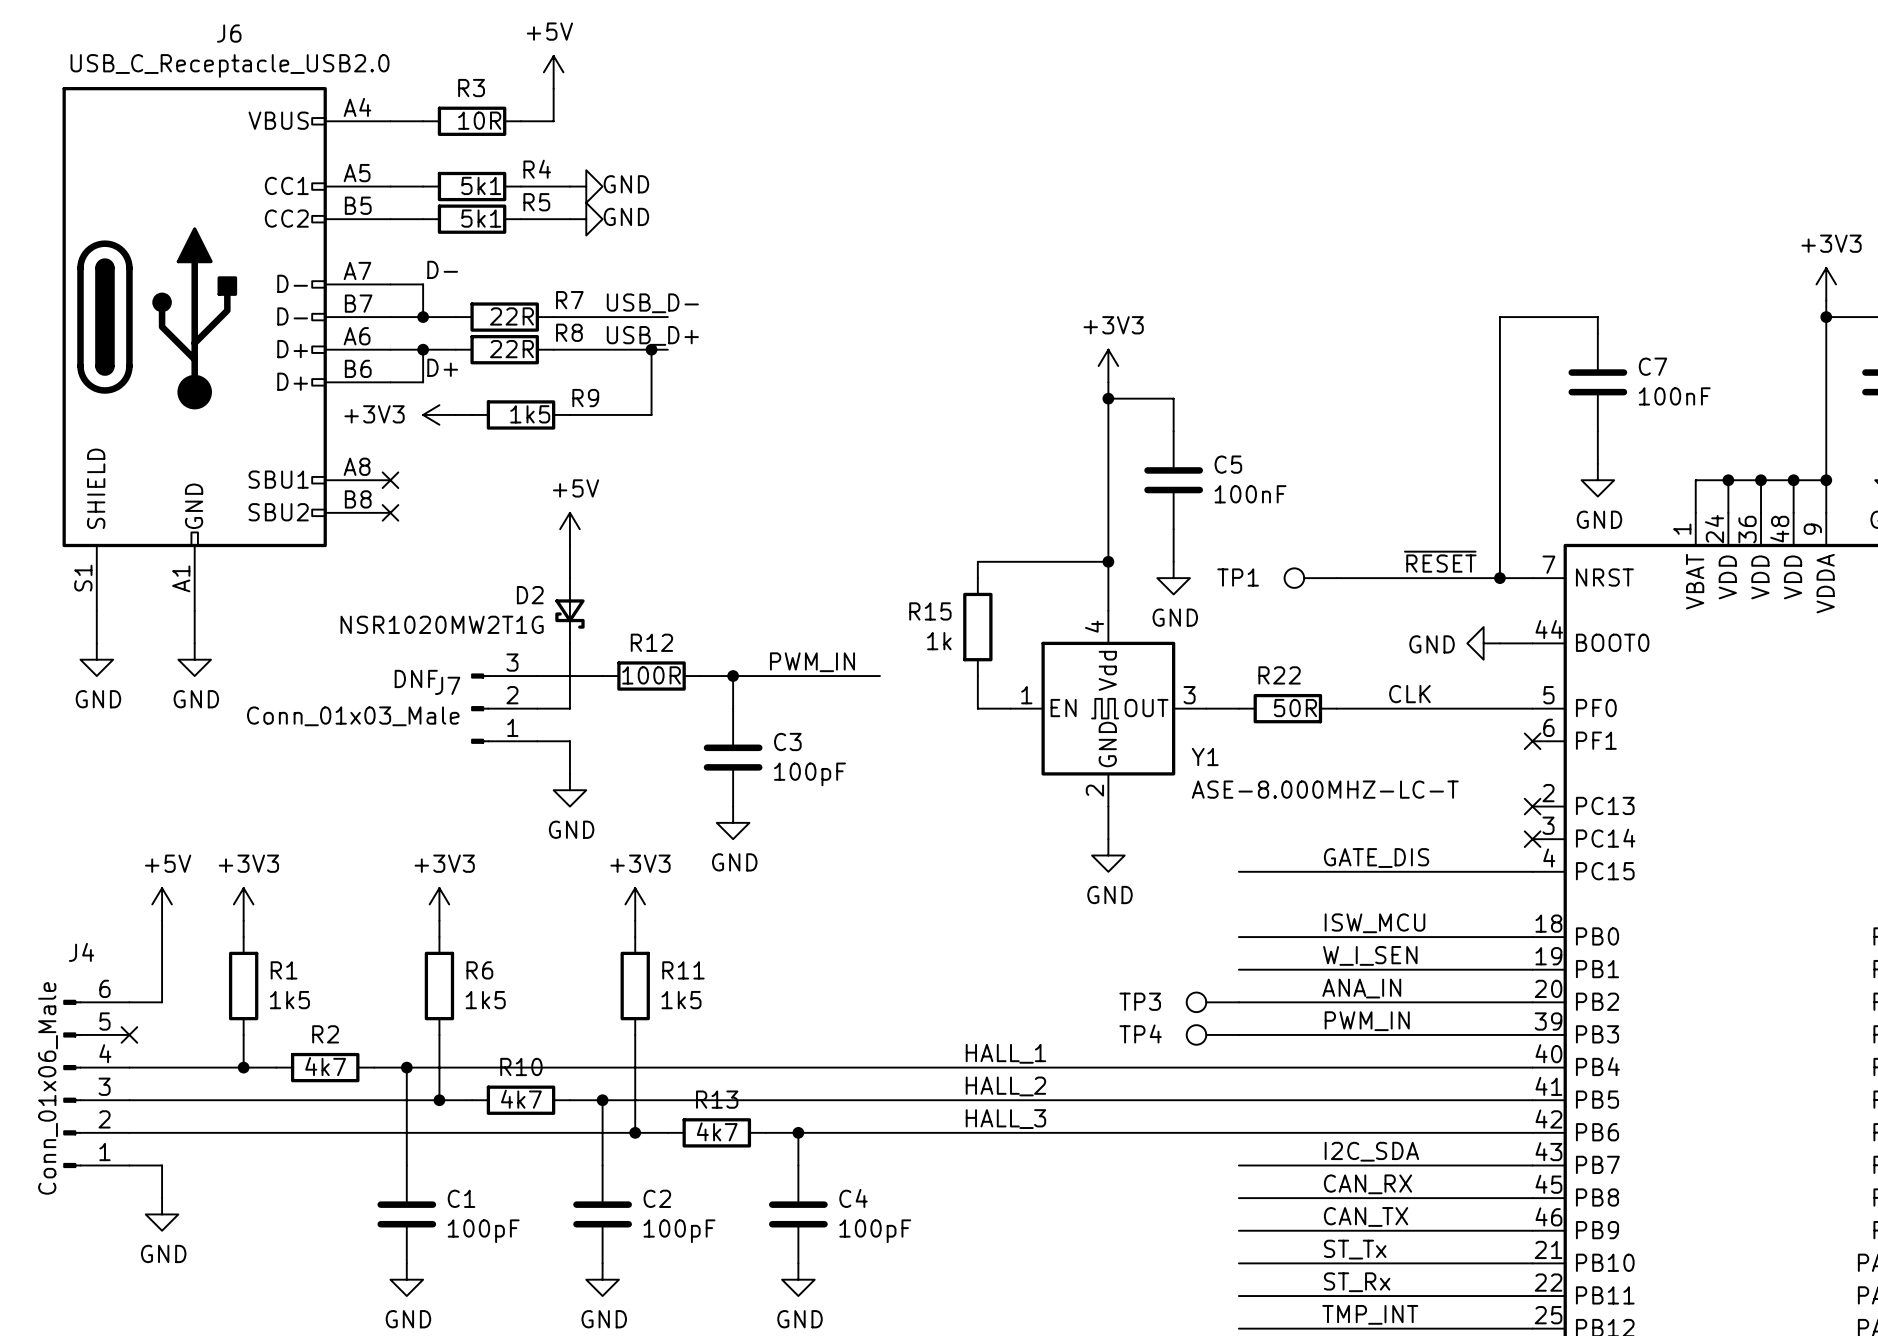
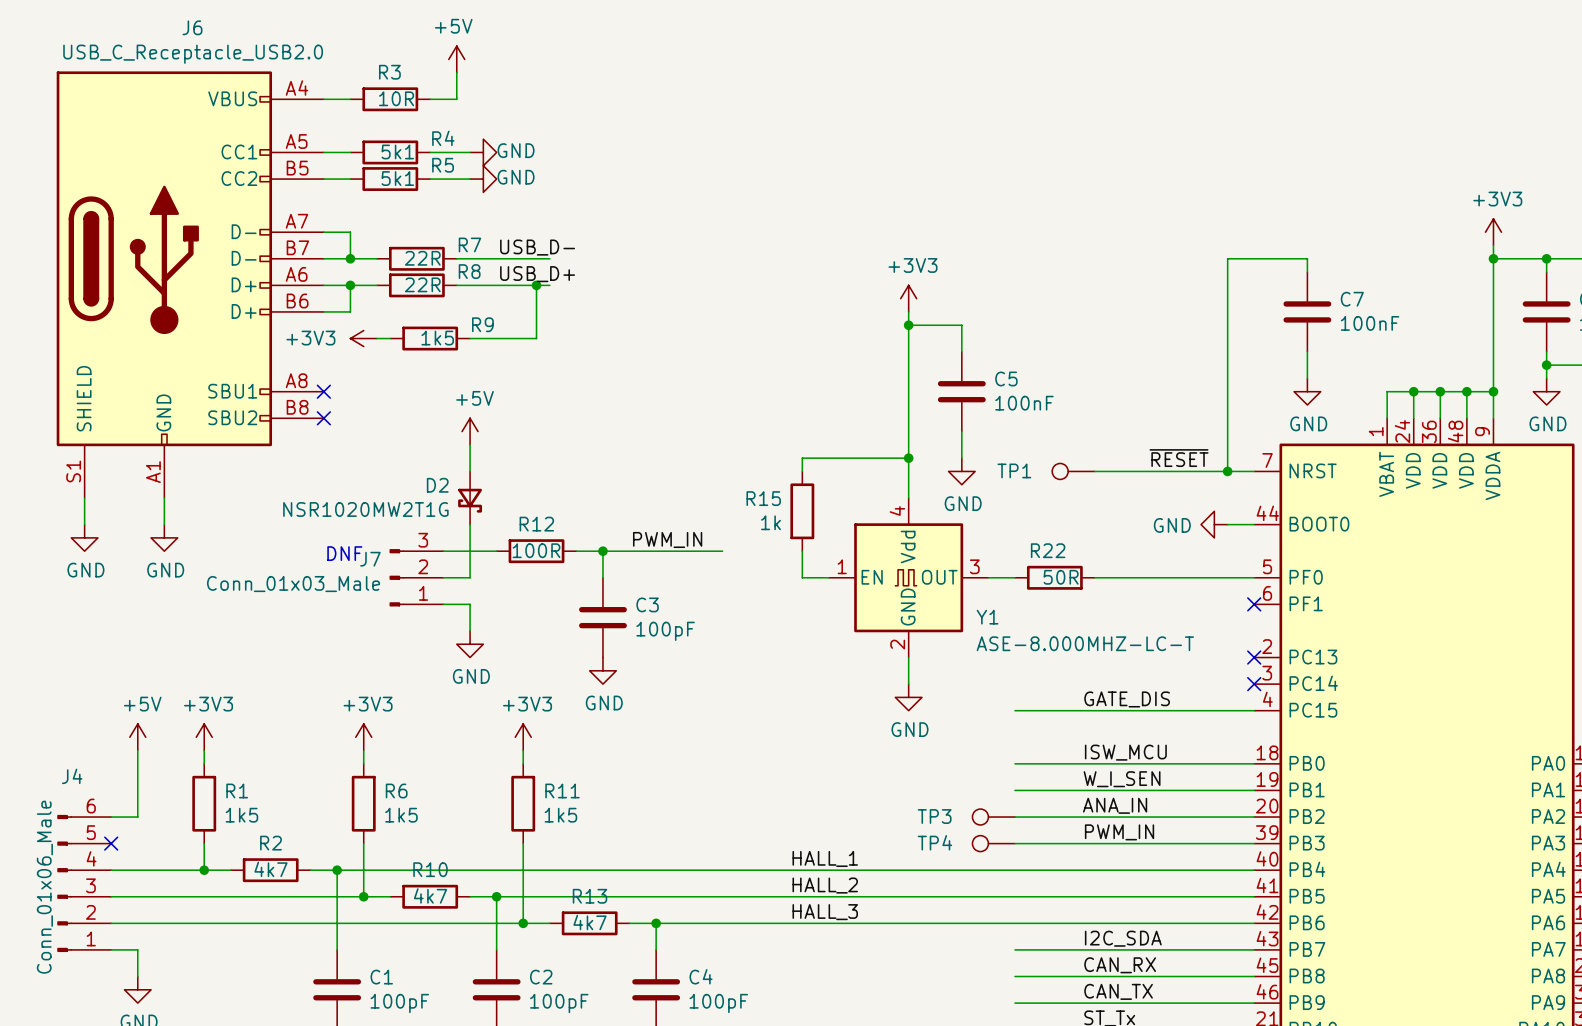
label: D- (442, 269) -> none
label: D+ (442, 367) -> none
label: CLK (1409, 694) -> none

